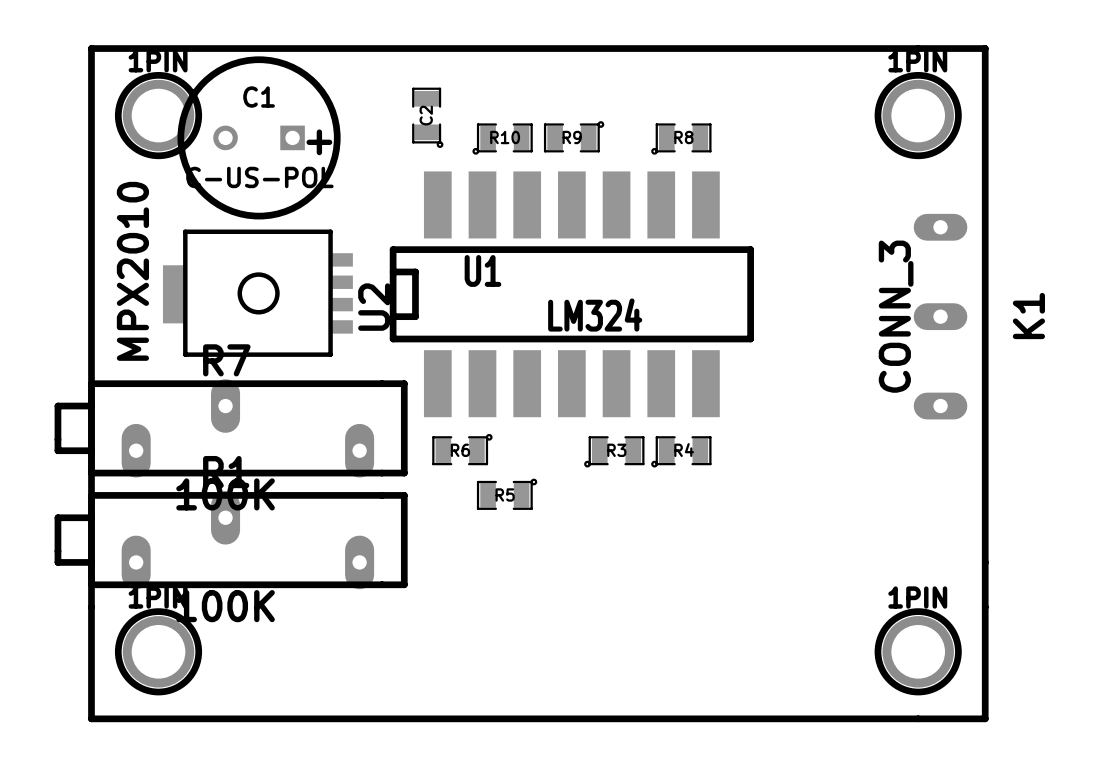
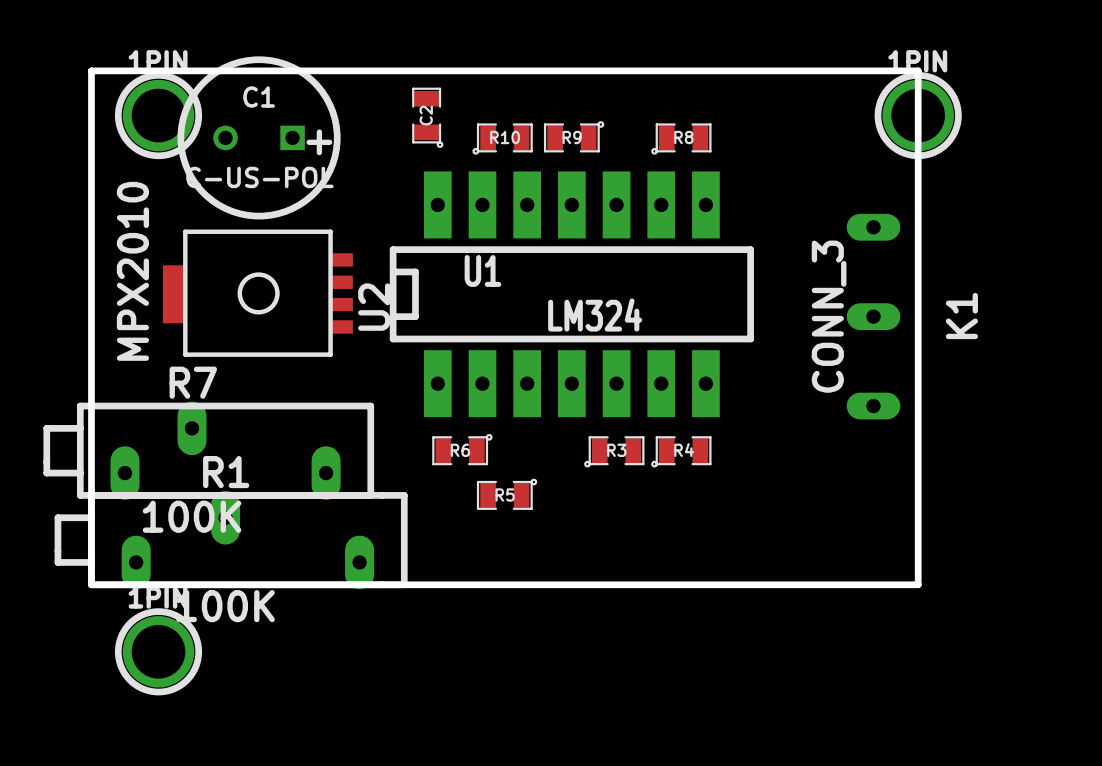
board edge: (91, 70) (91, 48) (985, 48) (985, 718) (91, 718) (91, 584) -> (91, 70) (918, 70) (918, 584) (91, 584)
U1 footprint: [389, 171, 754, 418] -> [389, 171, 754, 418]
K1 position: (940, 316) -> (873, 316)
R7 footprint: [54, 379, 408, 478] -> [43, 401, 375, 500]
1PIN: (918, 651) -> none

